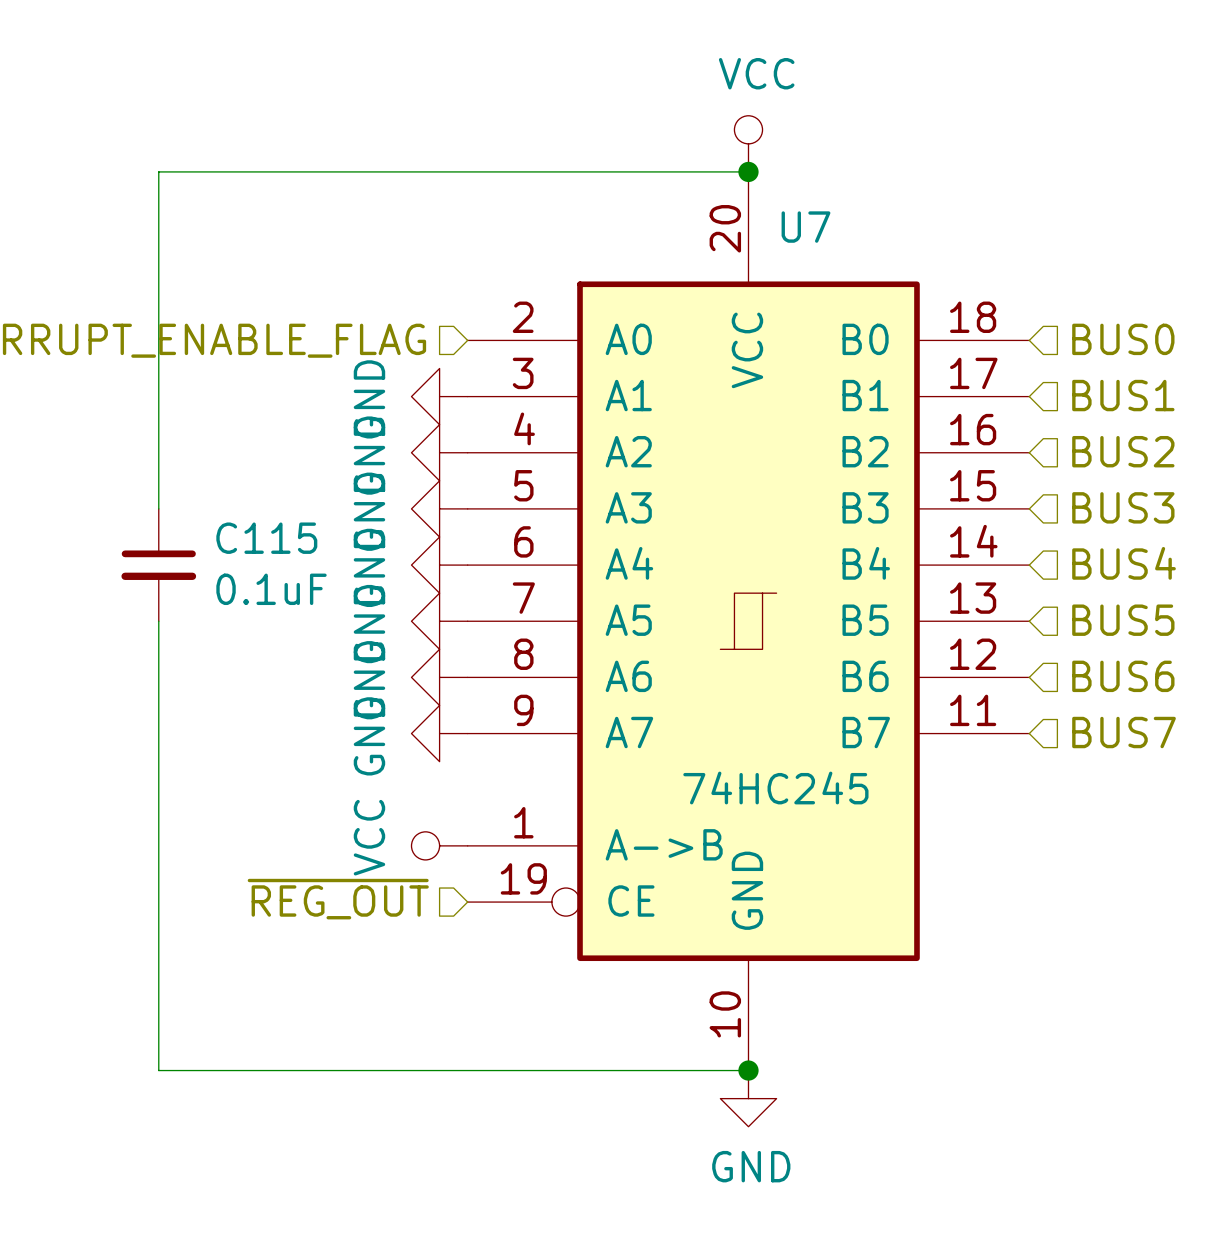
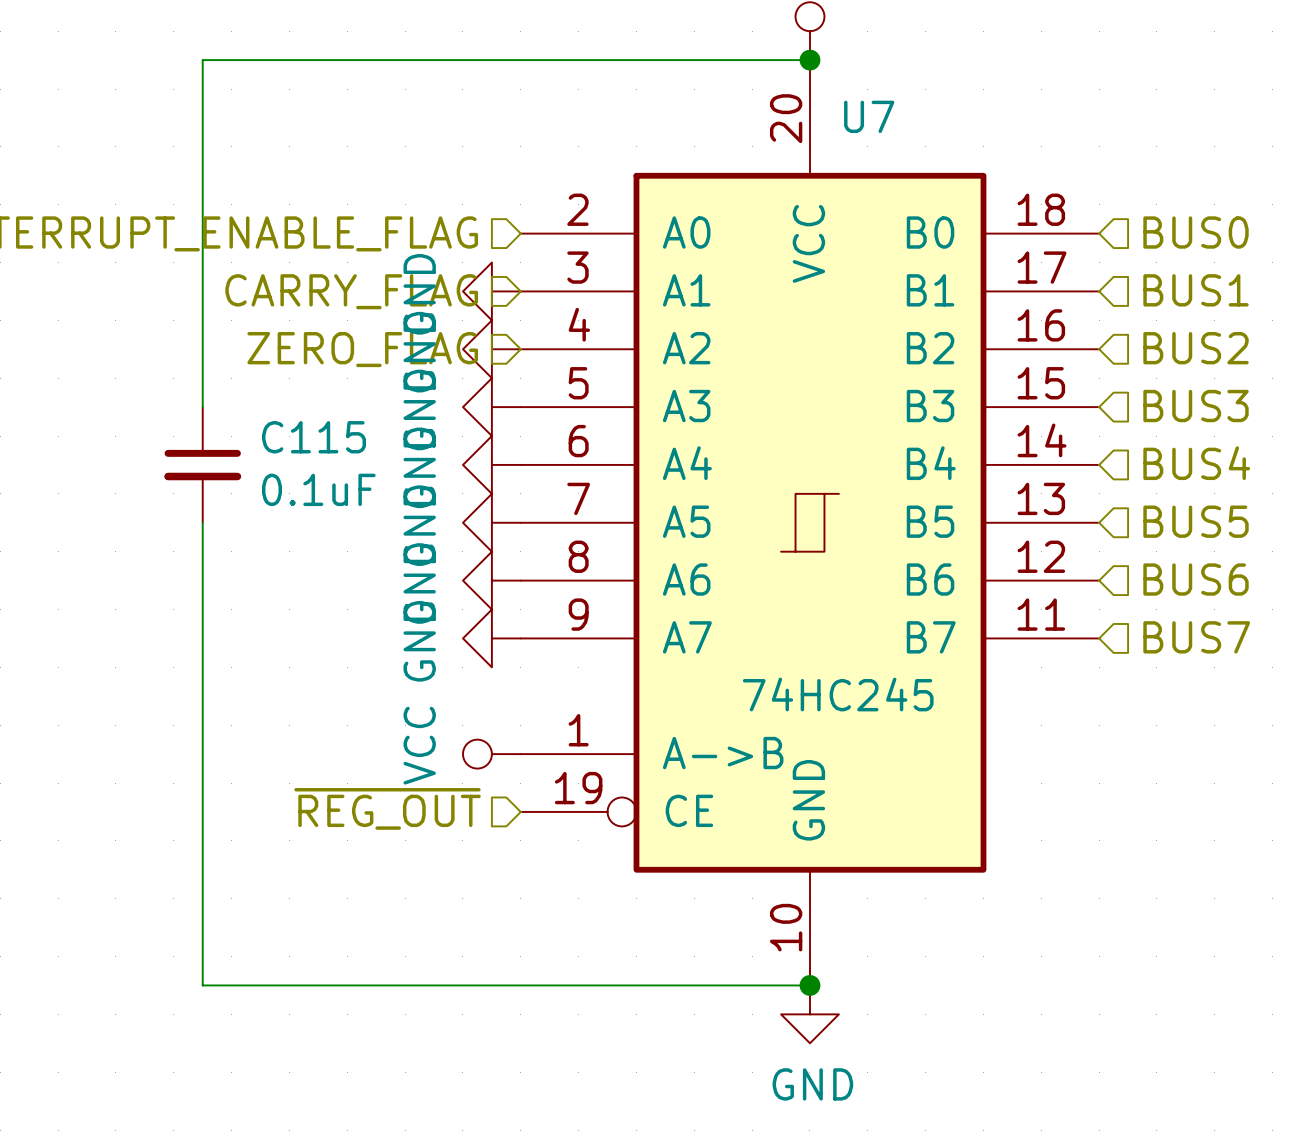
hierarchical label: none -> CARRY_FLAG (351, 291)
hierarchical label: none -> ZERO_FLAG (362, 349)

